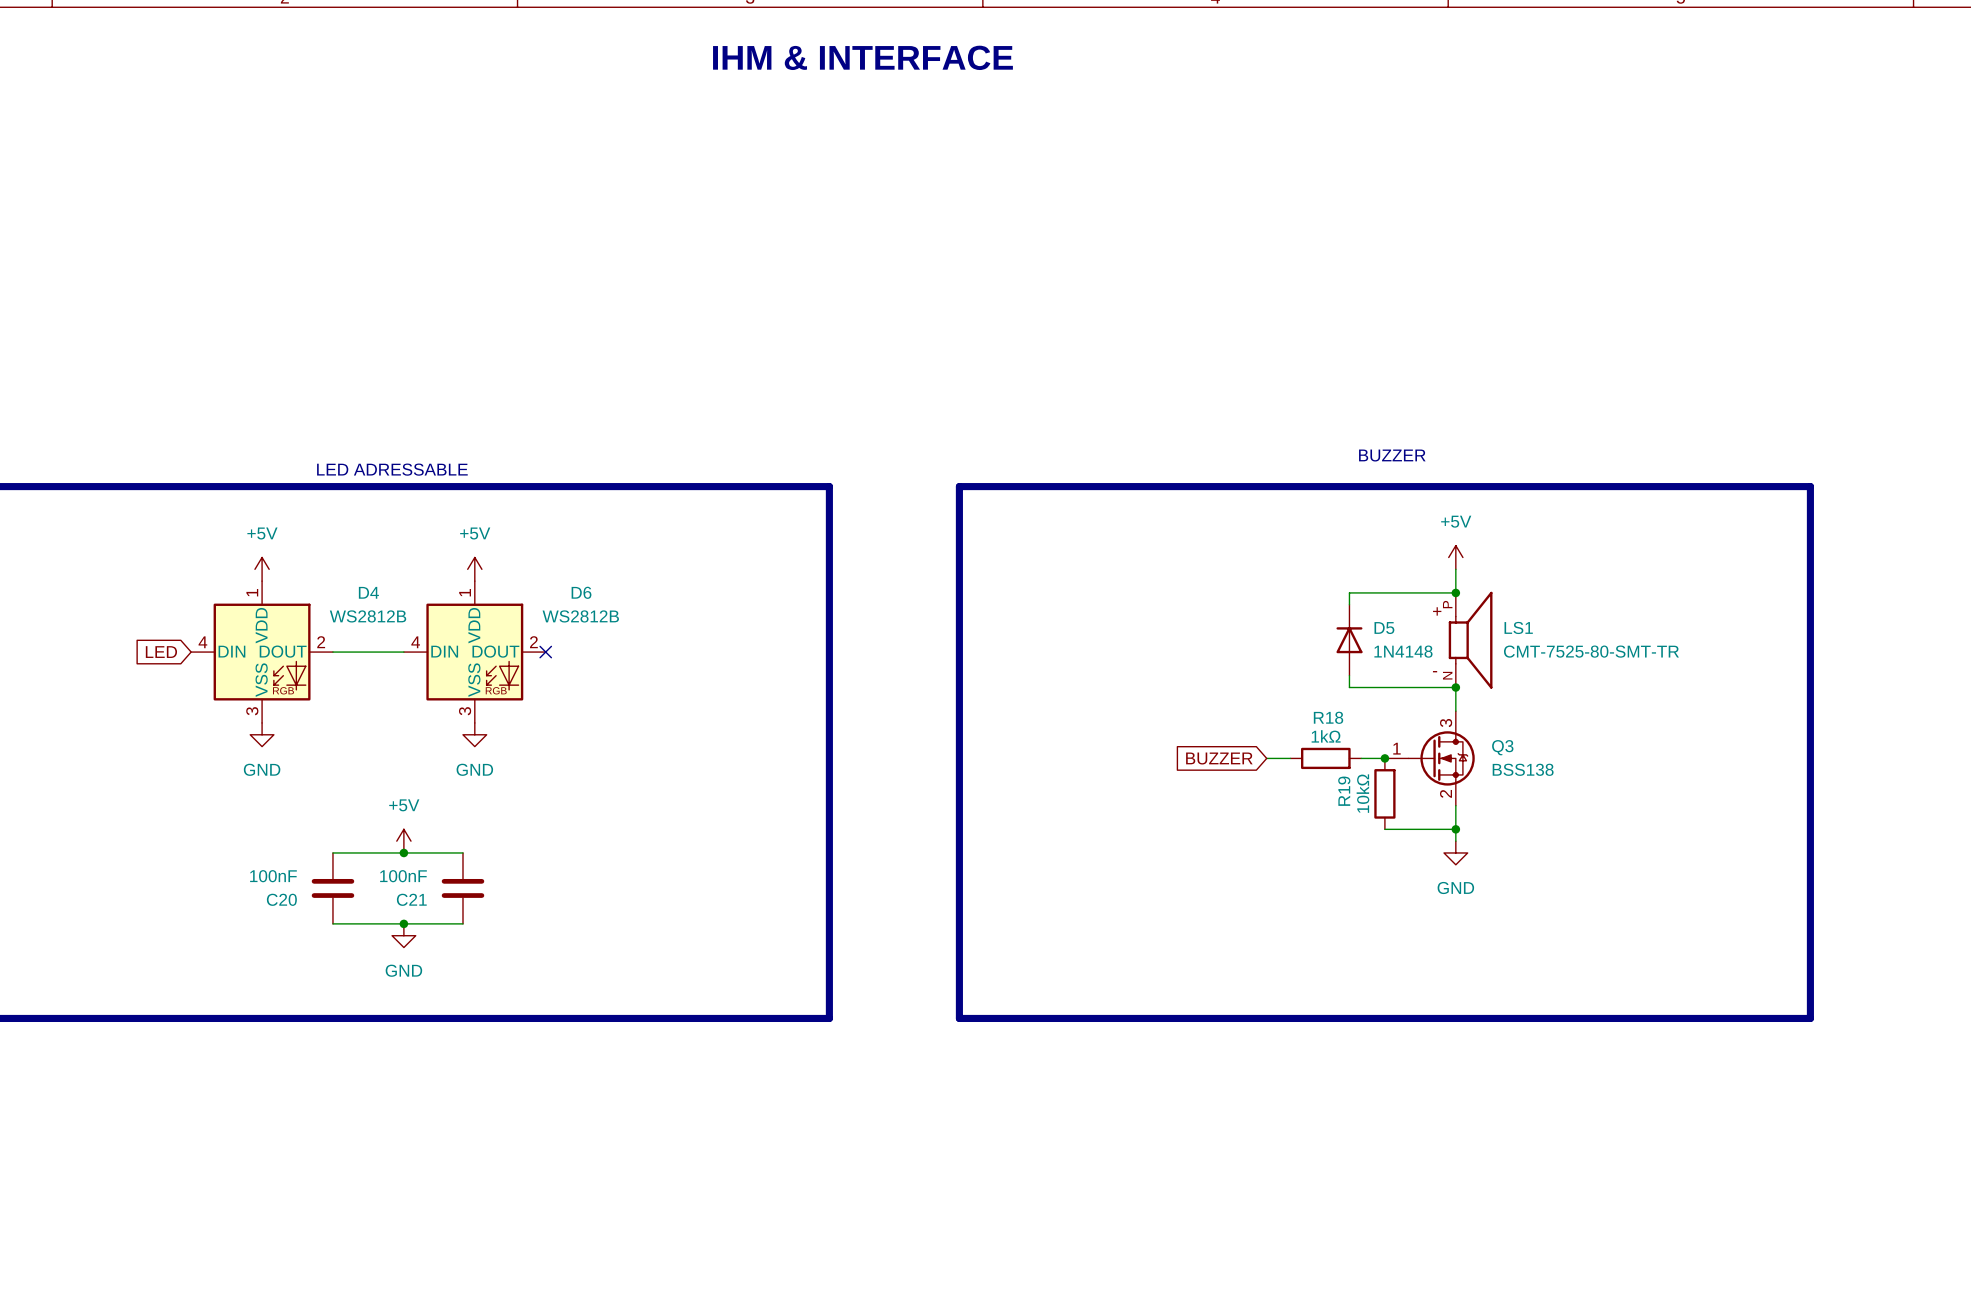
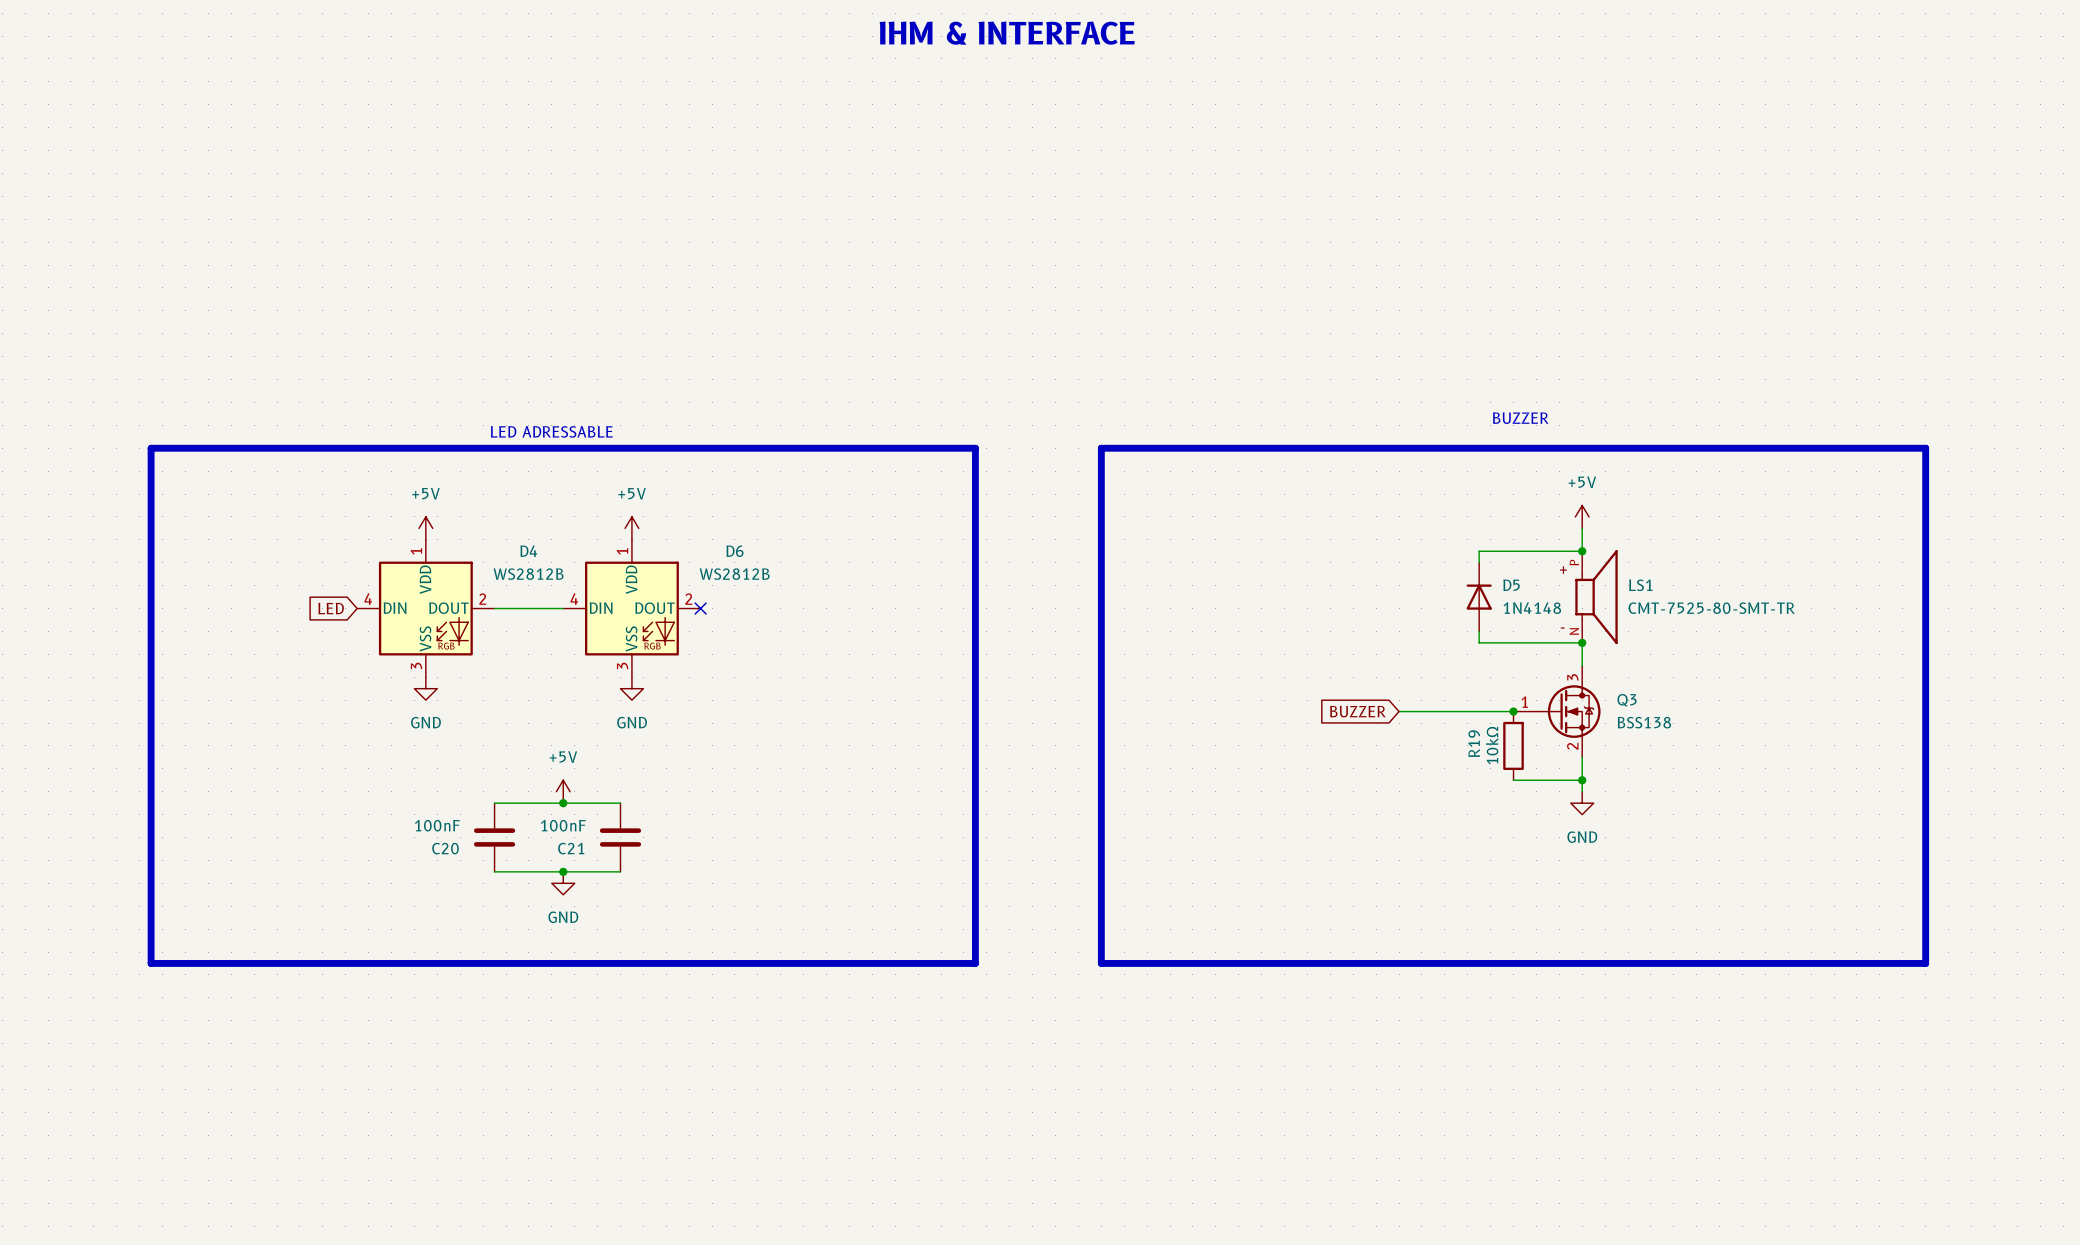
wire: none -> (1421, 711) (1490, 711)
R18: 1kΩ (1325, 758) -> none

